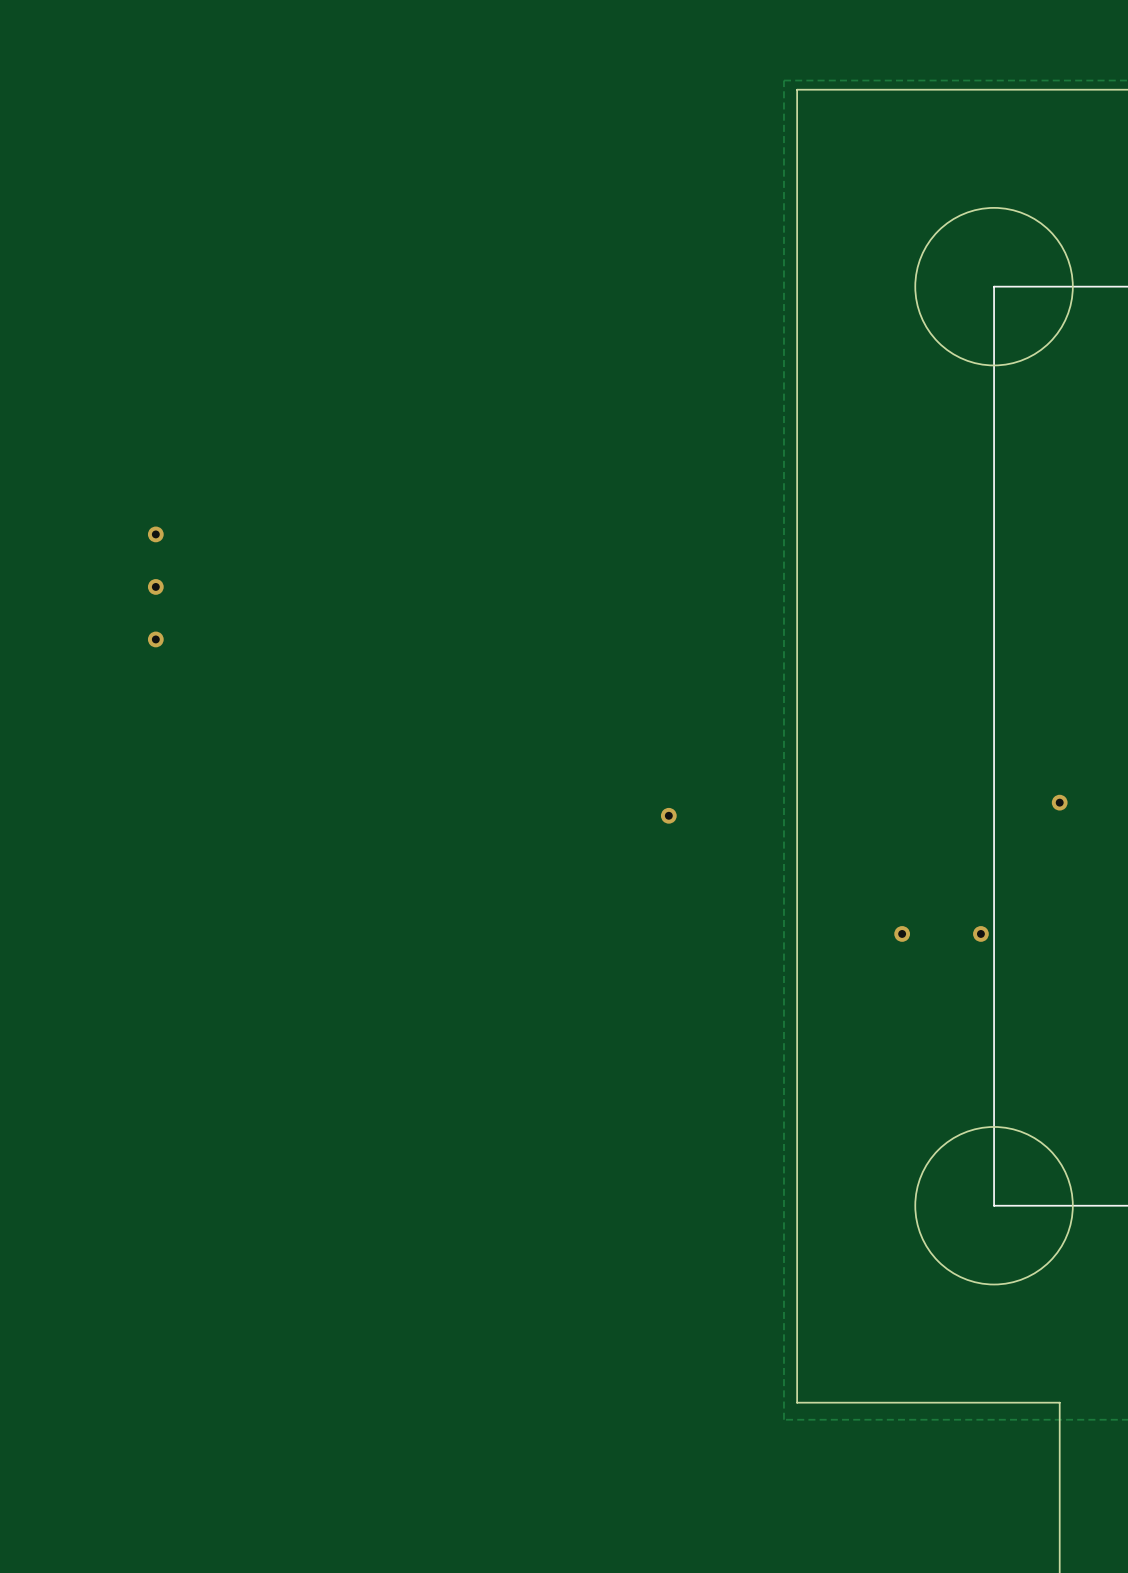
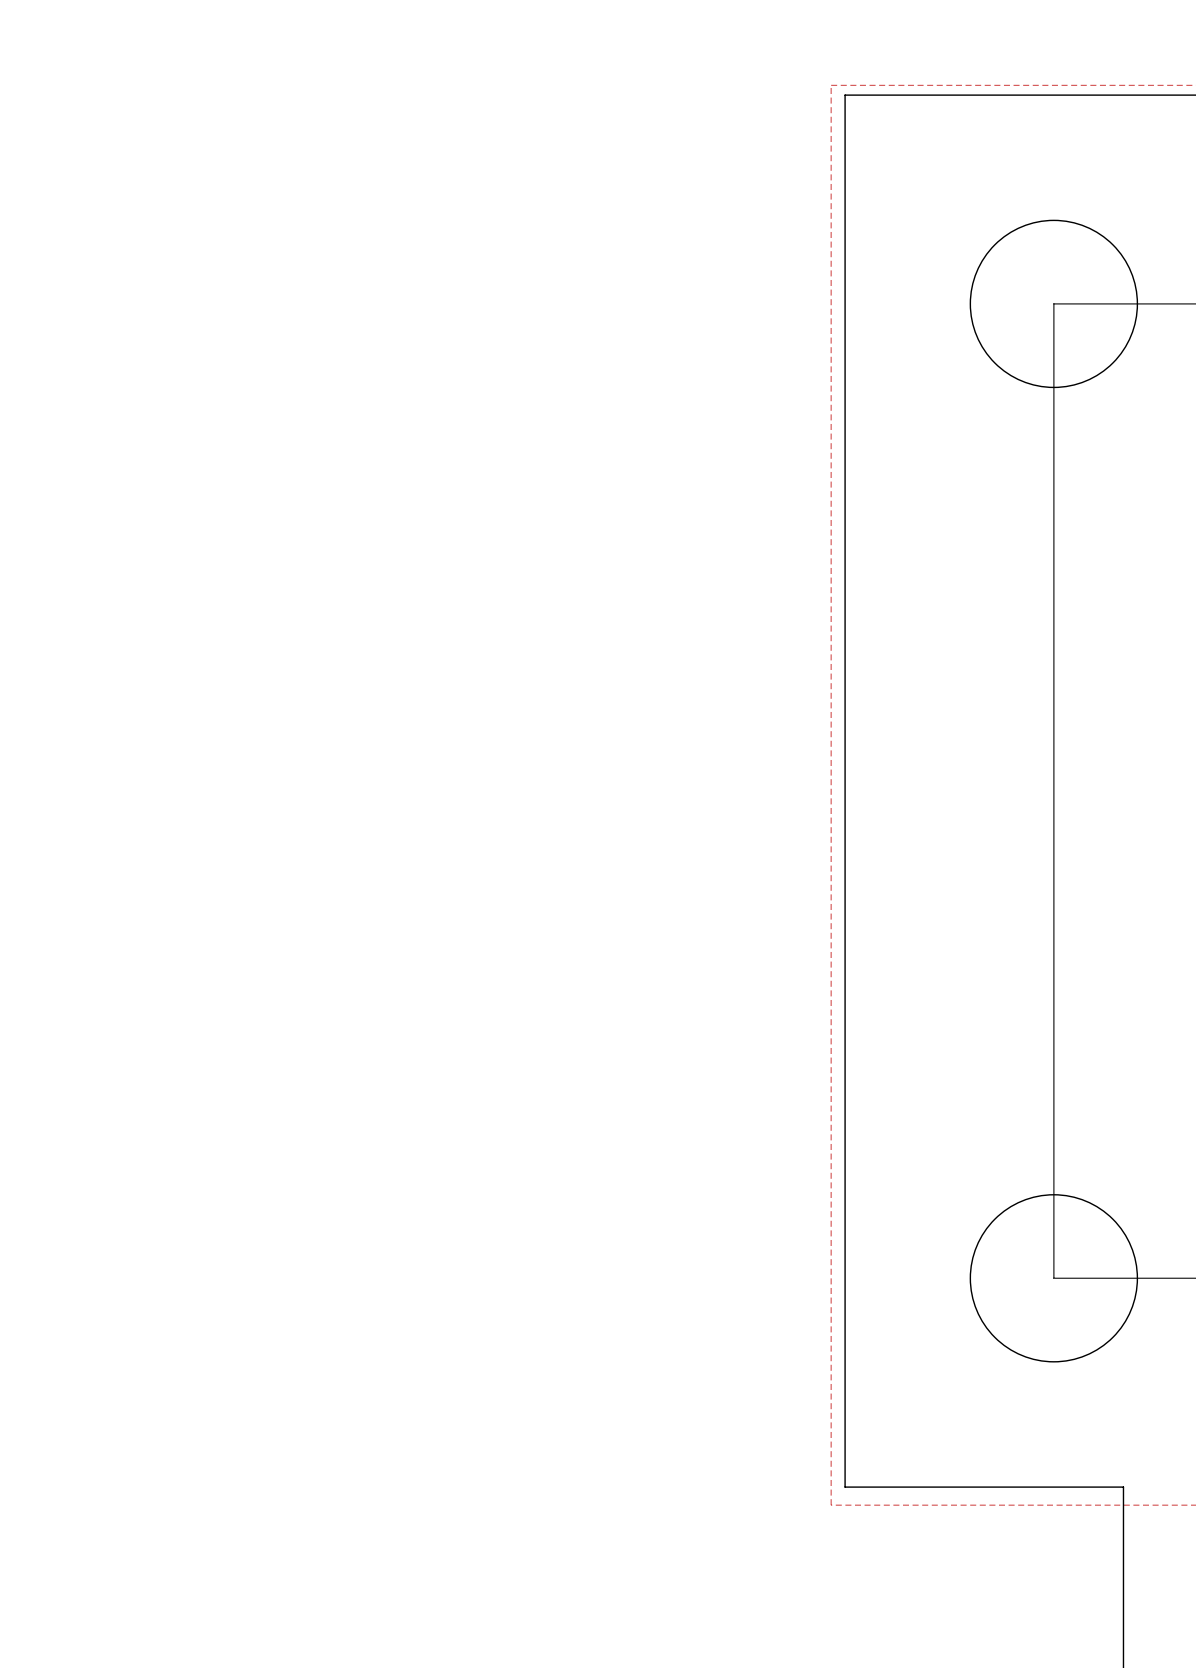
via: (155, 534) -> none
via: (155, 586) -> none
via: (155, 639) -> none
via: (1059, 802) -> none
via: (668, 815) -> none
via: (902, 933) -> none
via: (980, 933) -> none

